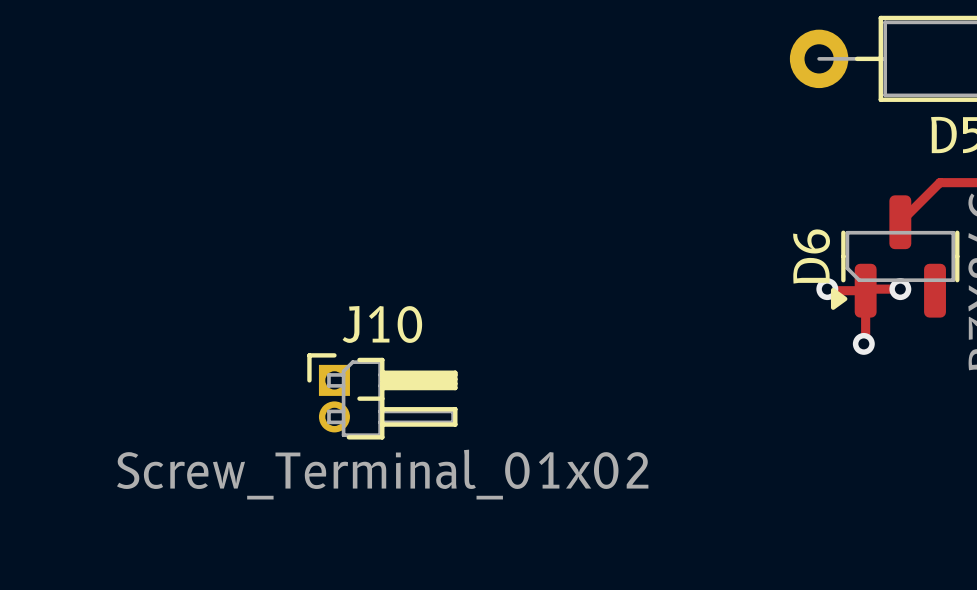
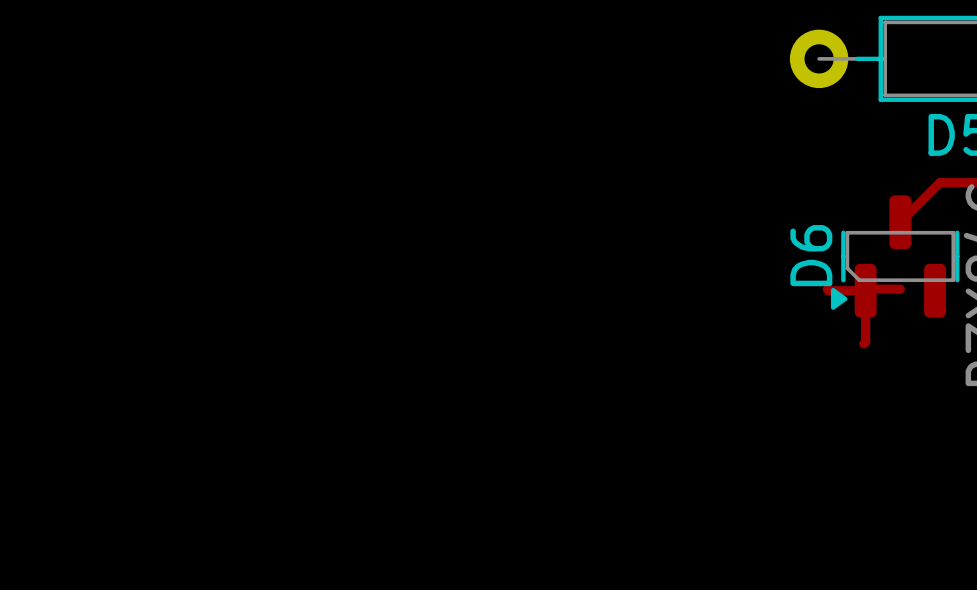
via: (827, 289) -> none
via: (900, 289) -> none
via: (863, 343) -> none
J10: Screw_Terminal_01x02 (382, 396) -> none

